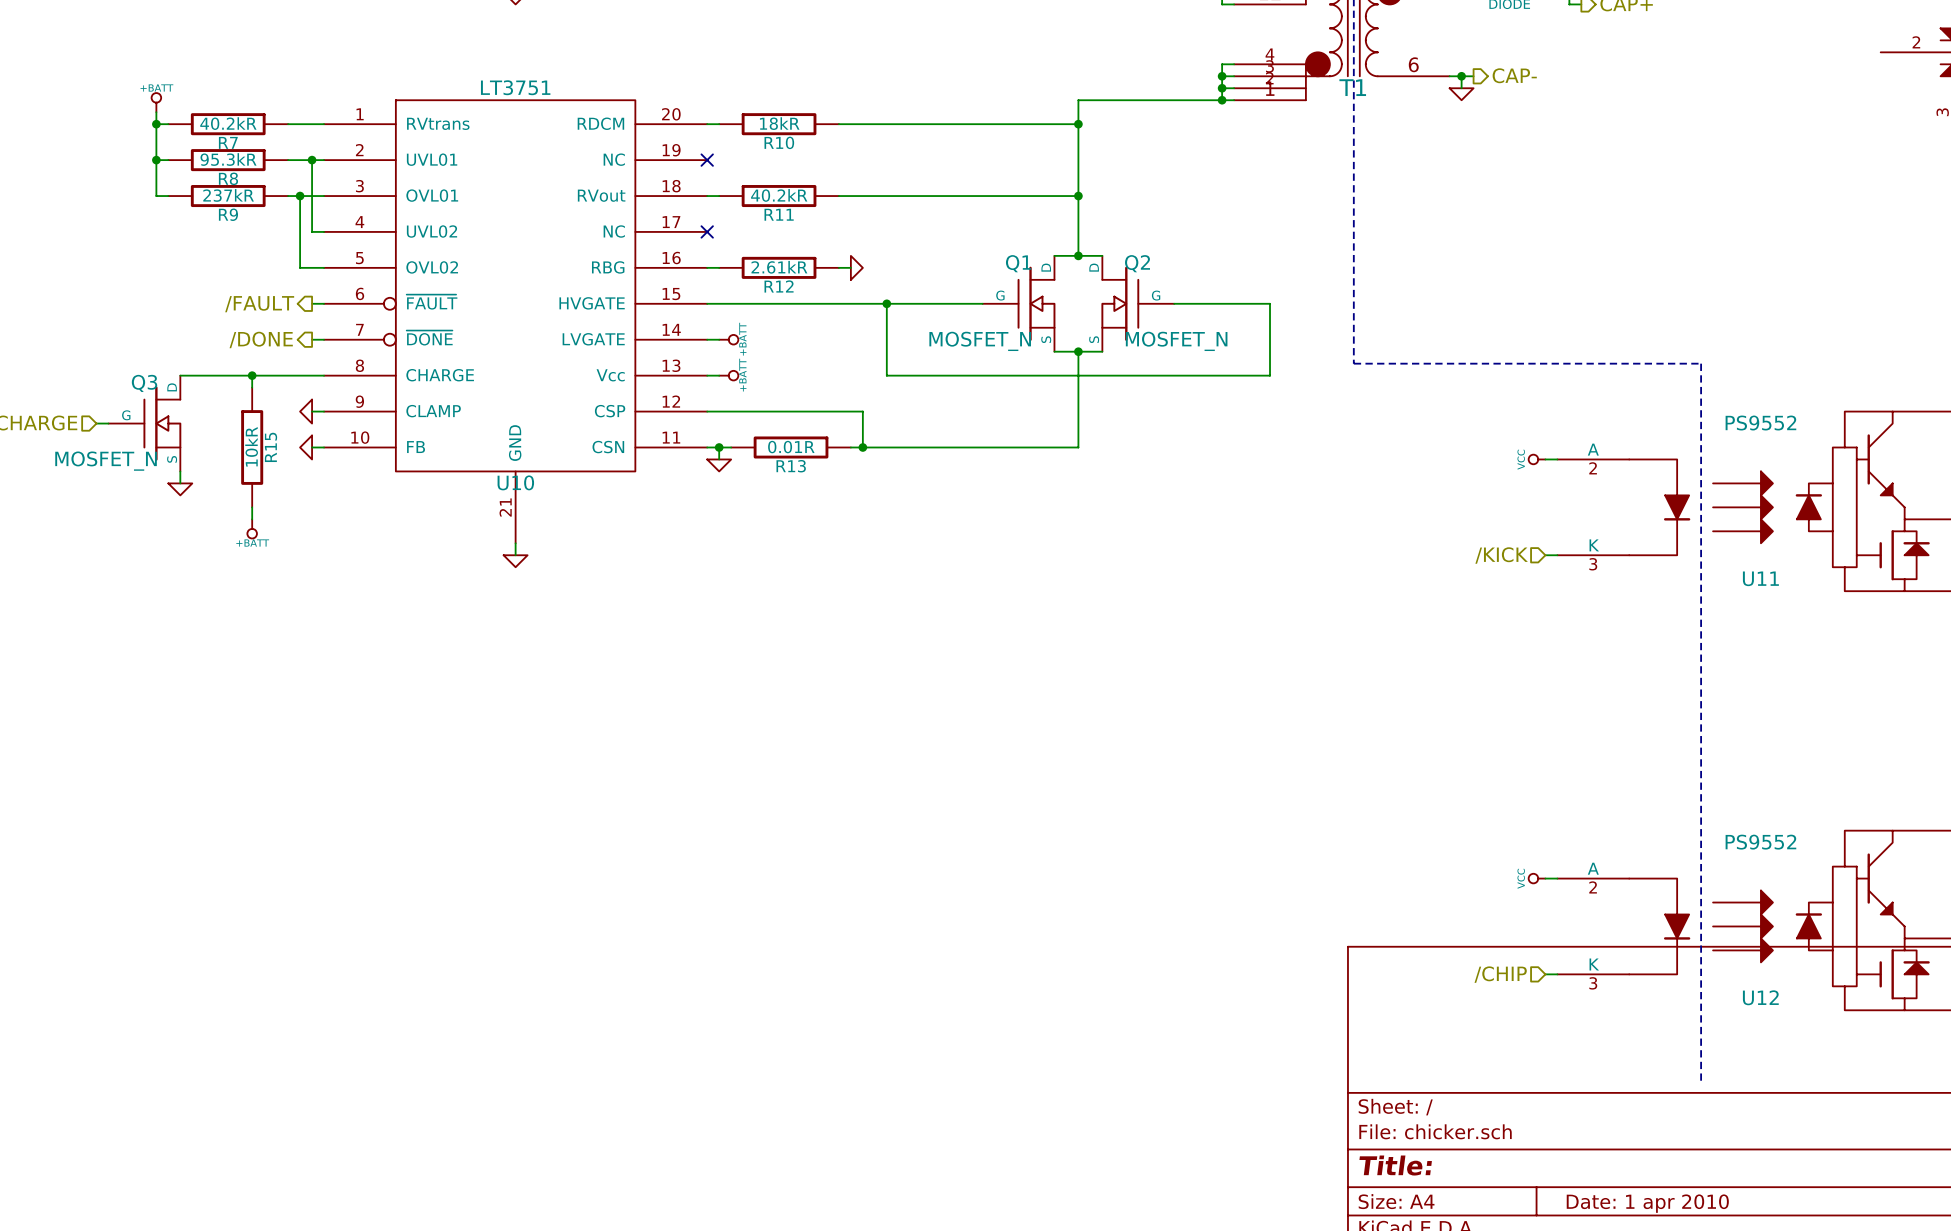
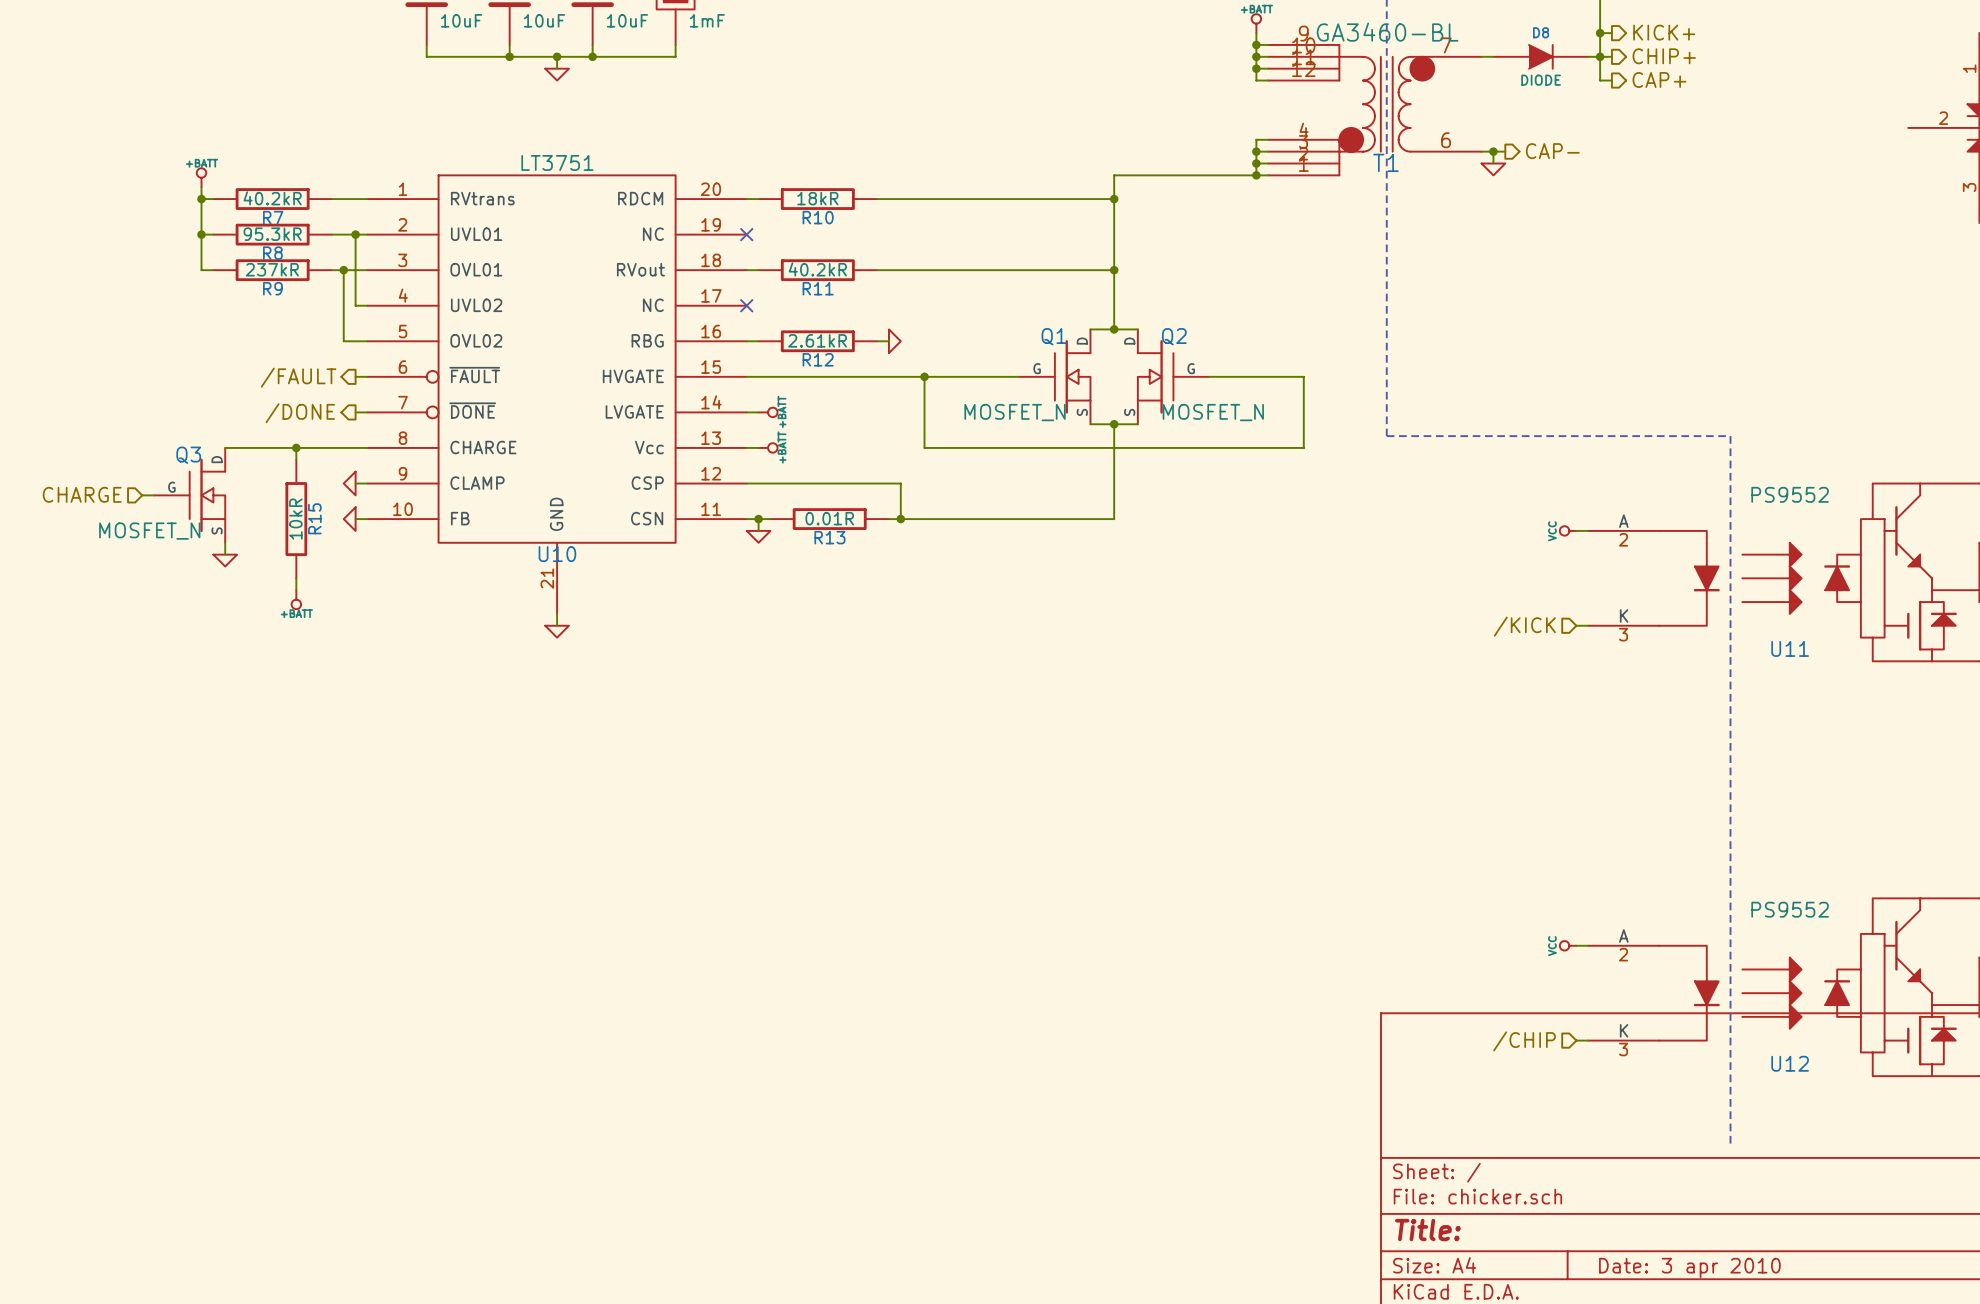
title block: Date: 1 apr 2010 (1647, 1203) -> Date: 3 apr 2010 (1689, 1267)

